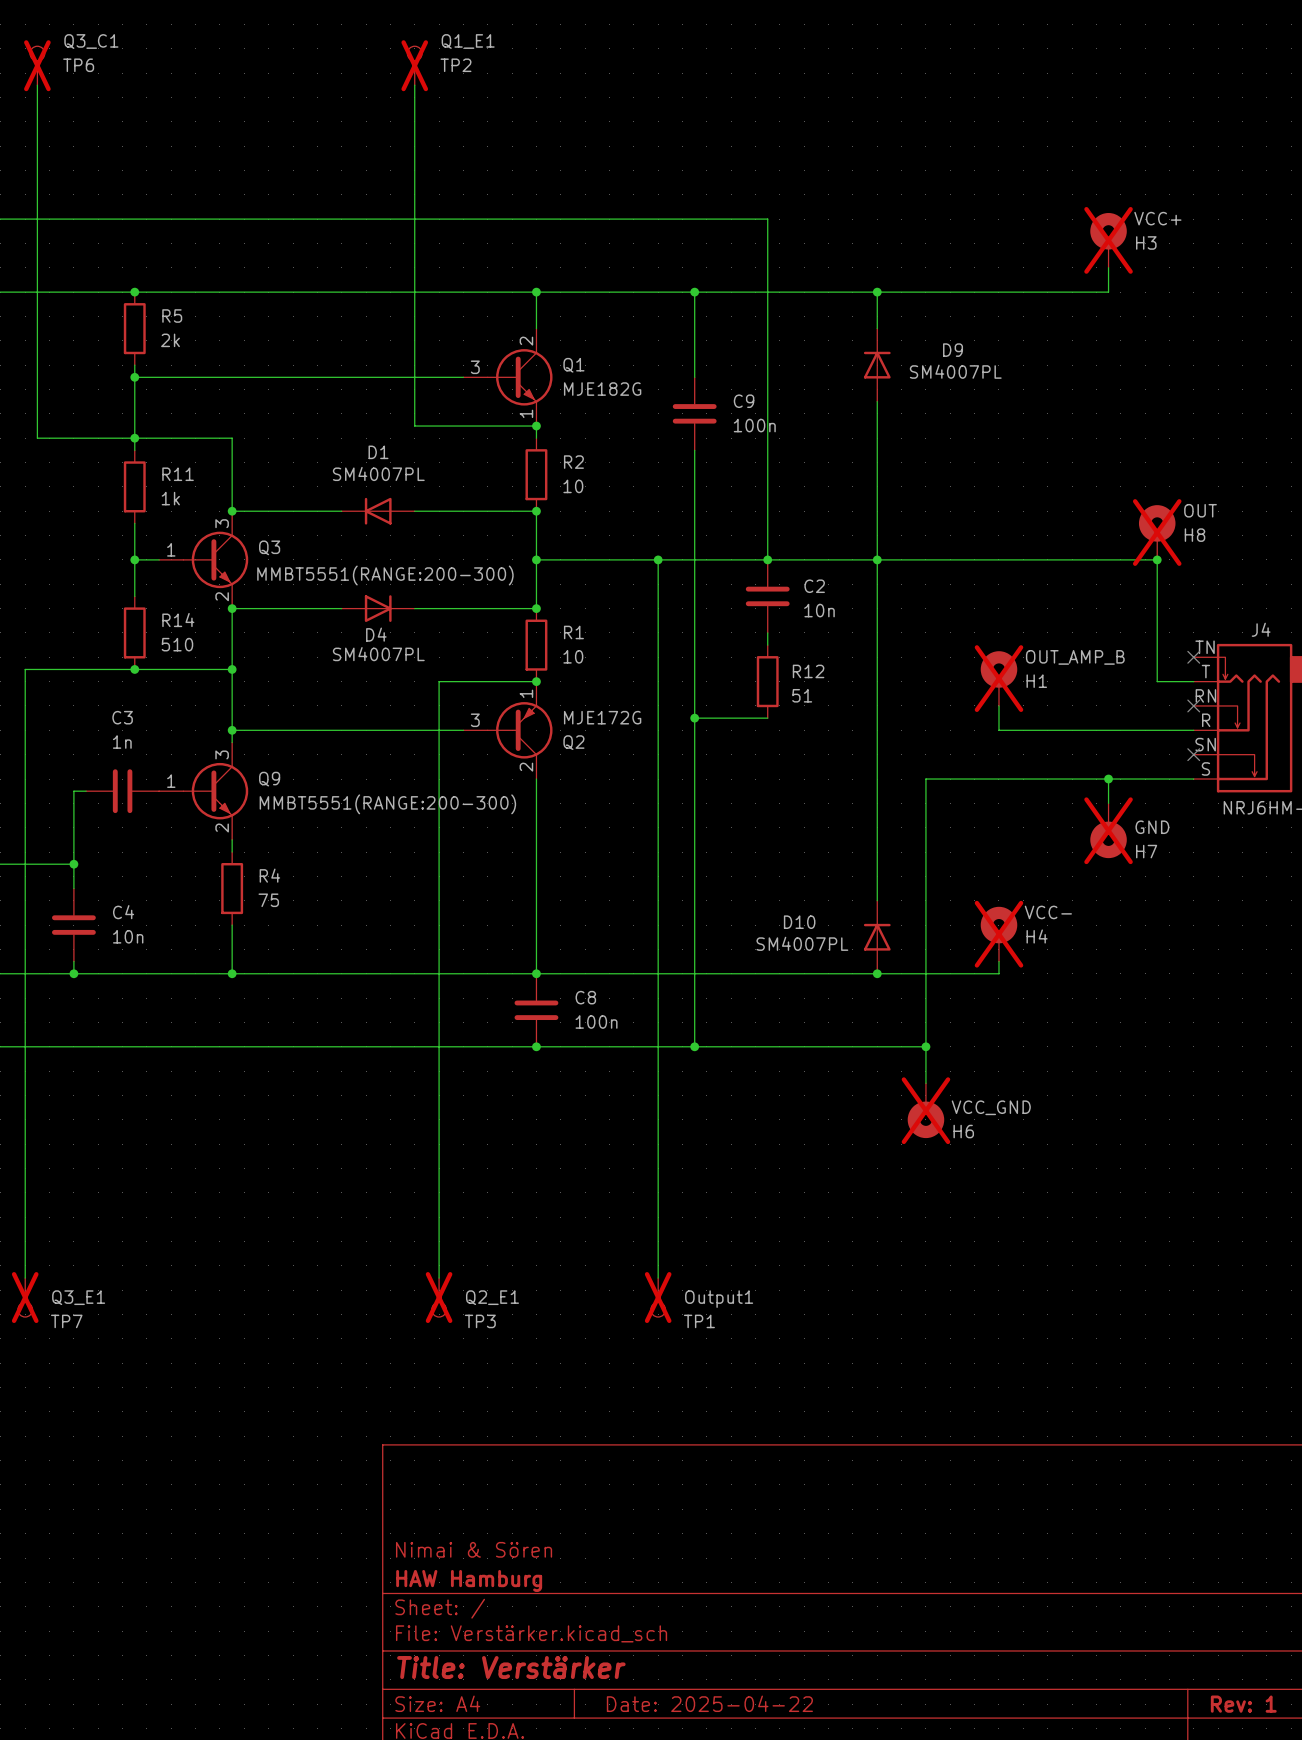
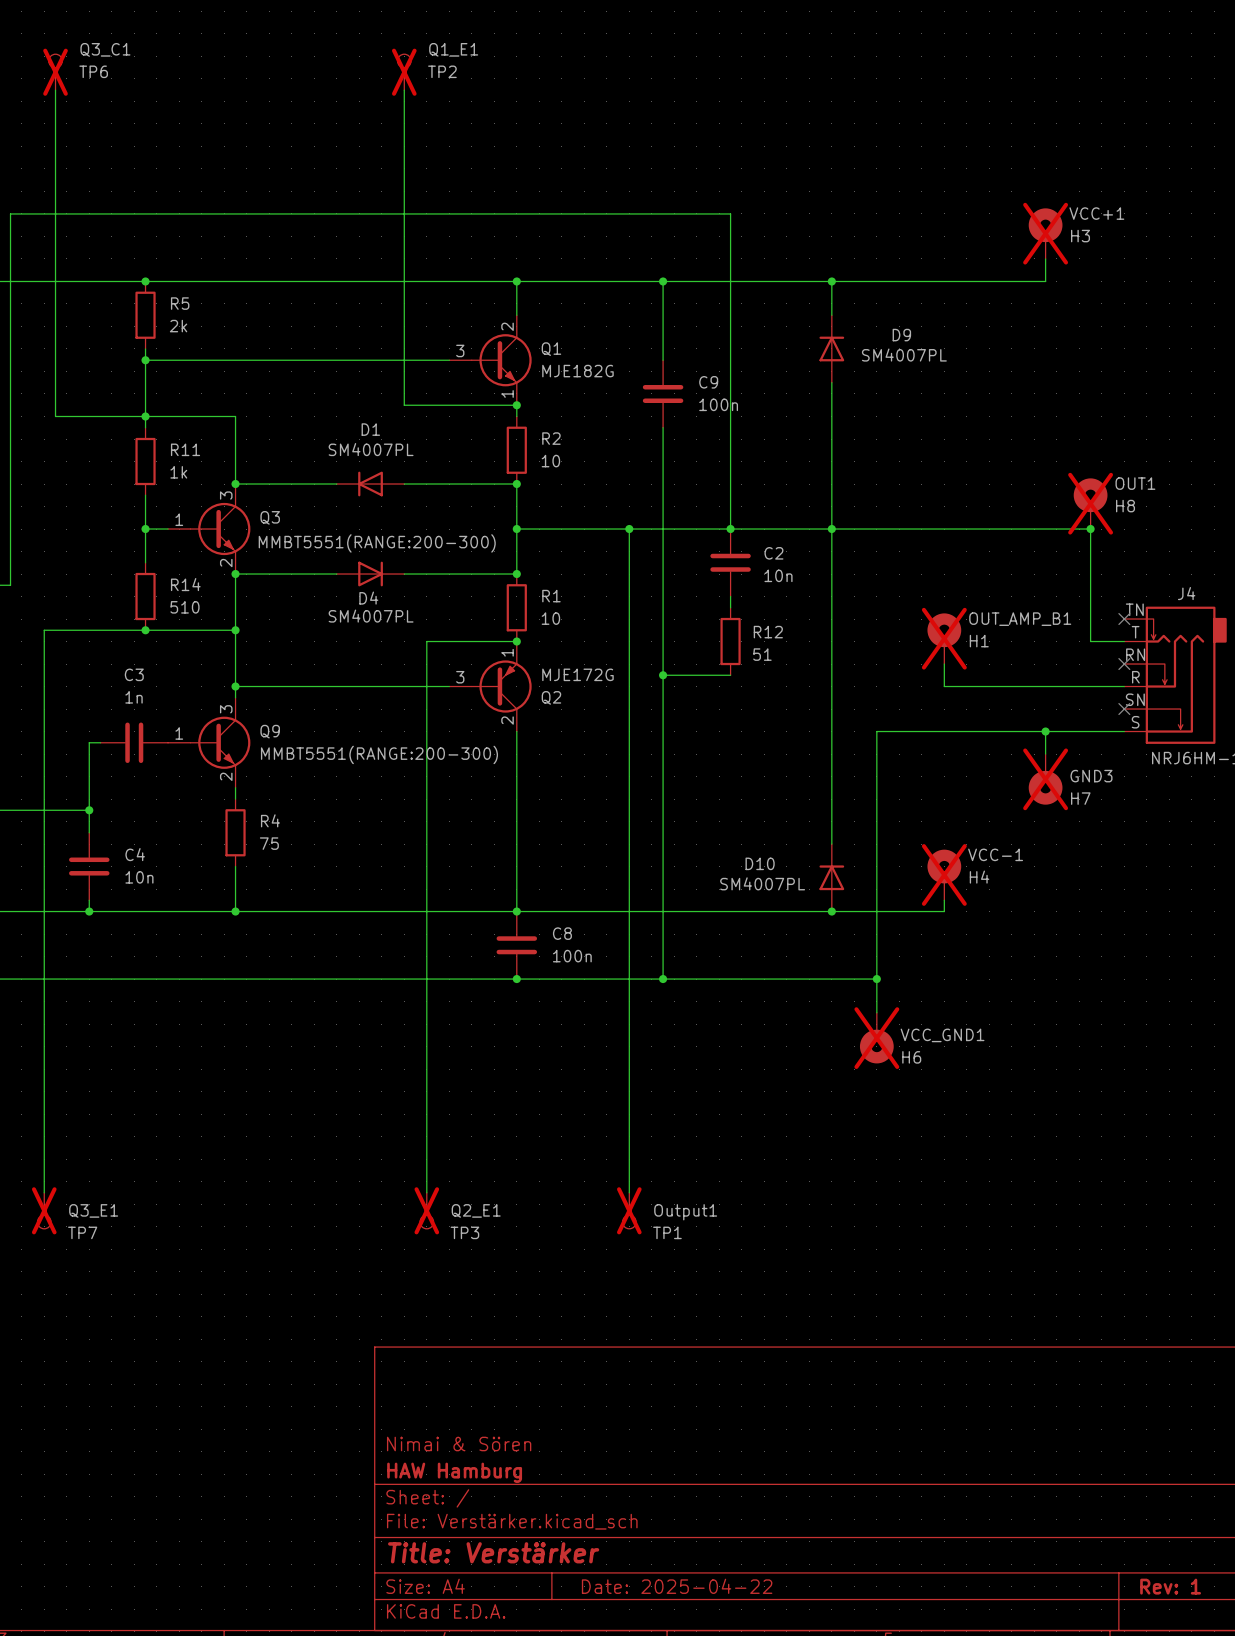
VCC+ name: VCC+ (1157, 218) -> VCC+1 (1096, 213)
OUT name: OUT (1200, 510) -> OUT1 (1135, 483)
OUT_AMP_B name: OUT_AMP_B (1075, 657) -> OUT_AMP_B1 (1020, 619)
GND name: GND (1152, 827) -> GND3 (1091, 776)
VCC- name: VCC- (1048, 912) -> VCC-1 (995, 854)
VCC_GND name: VCC_GND (991, 1107) -> VCC_GND1 (942, 1035)

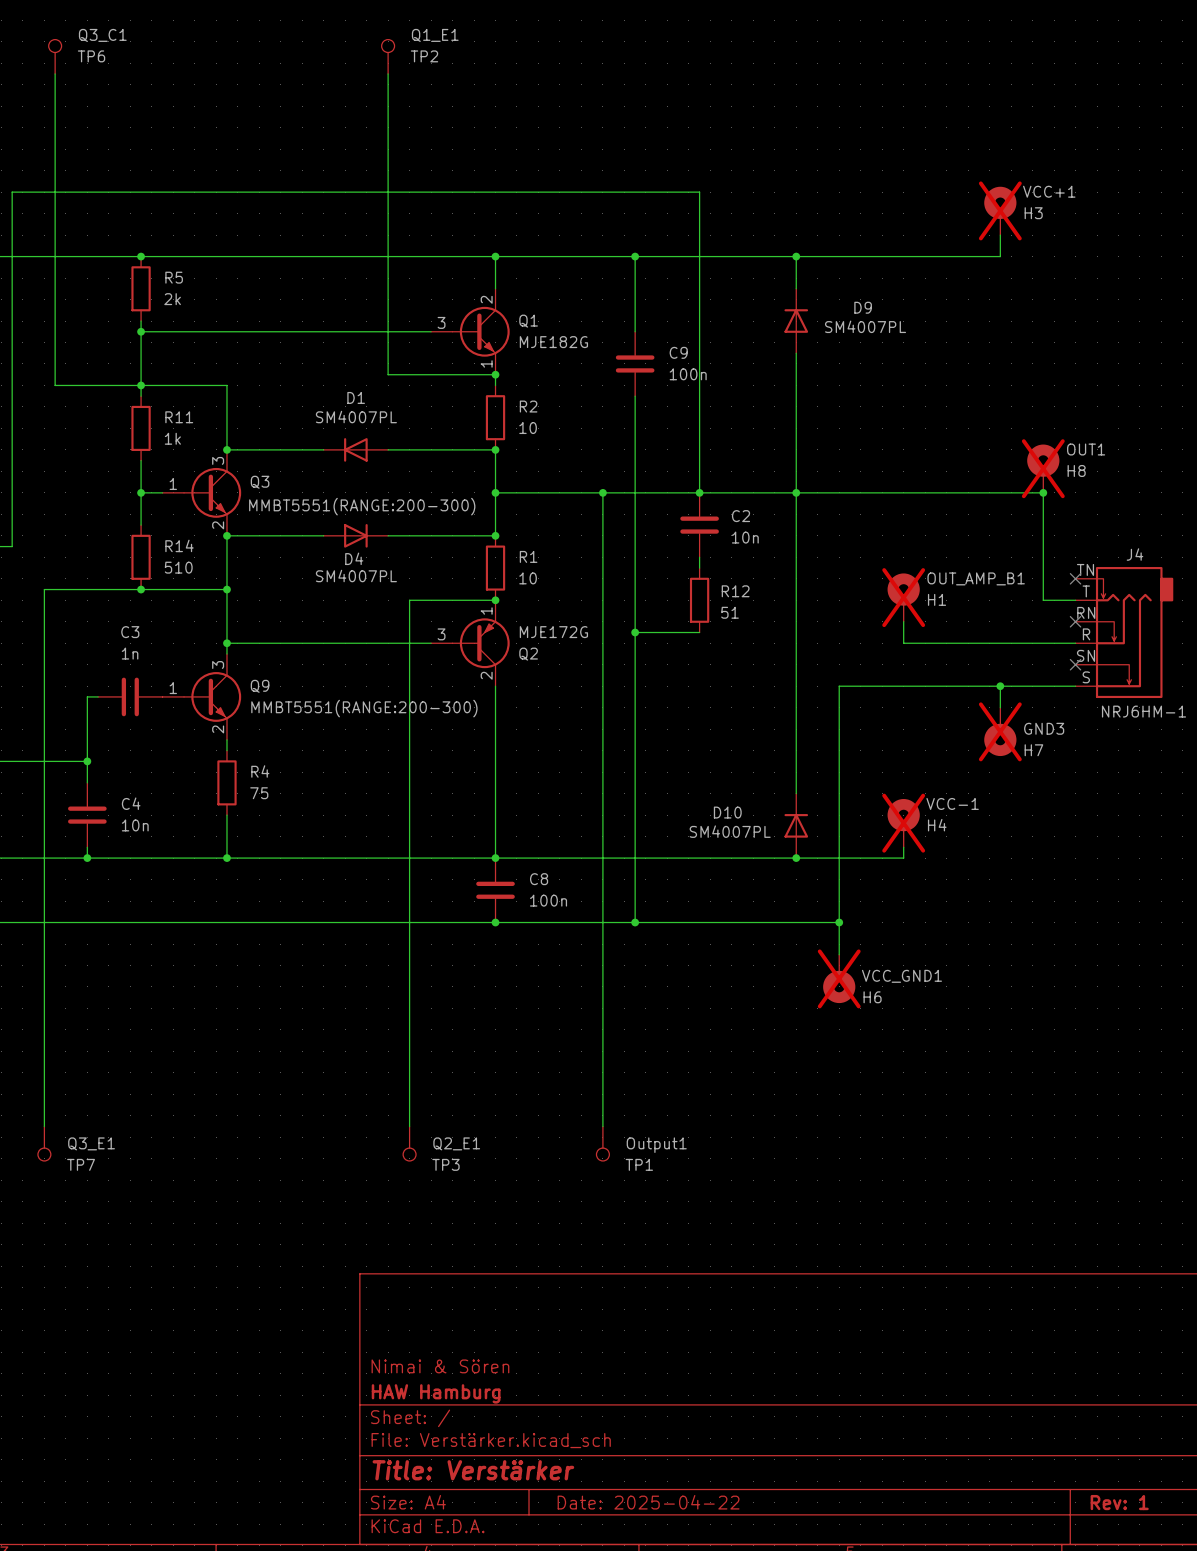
Q3_C1 do-not-place cross: (55, 72) -> none
Q1_E1 do-not-place cross: (404, 72) -> none
Q3_E1 do-not-place cross: (44, 1210) -> none
Q2_E1 do-not-place cross: (426, 1210) -> none
Output1 do-not-place cross: (629, 1210) -> none

